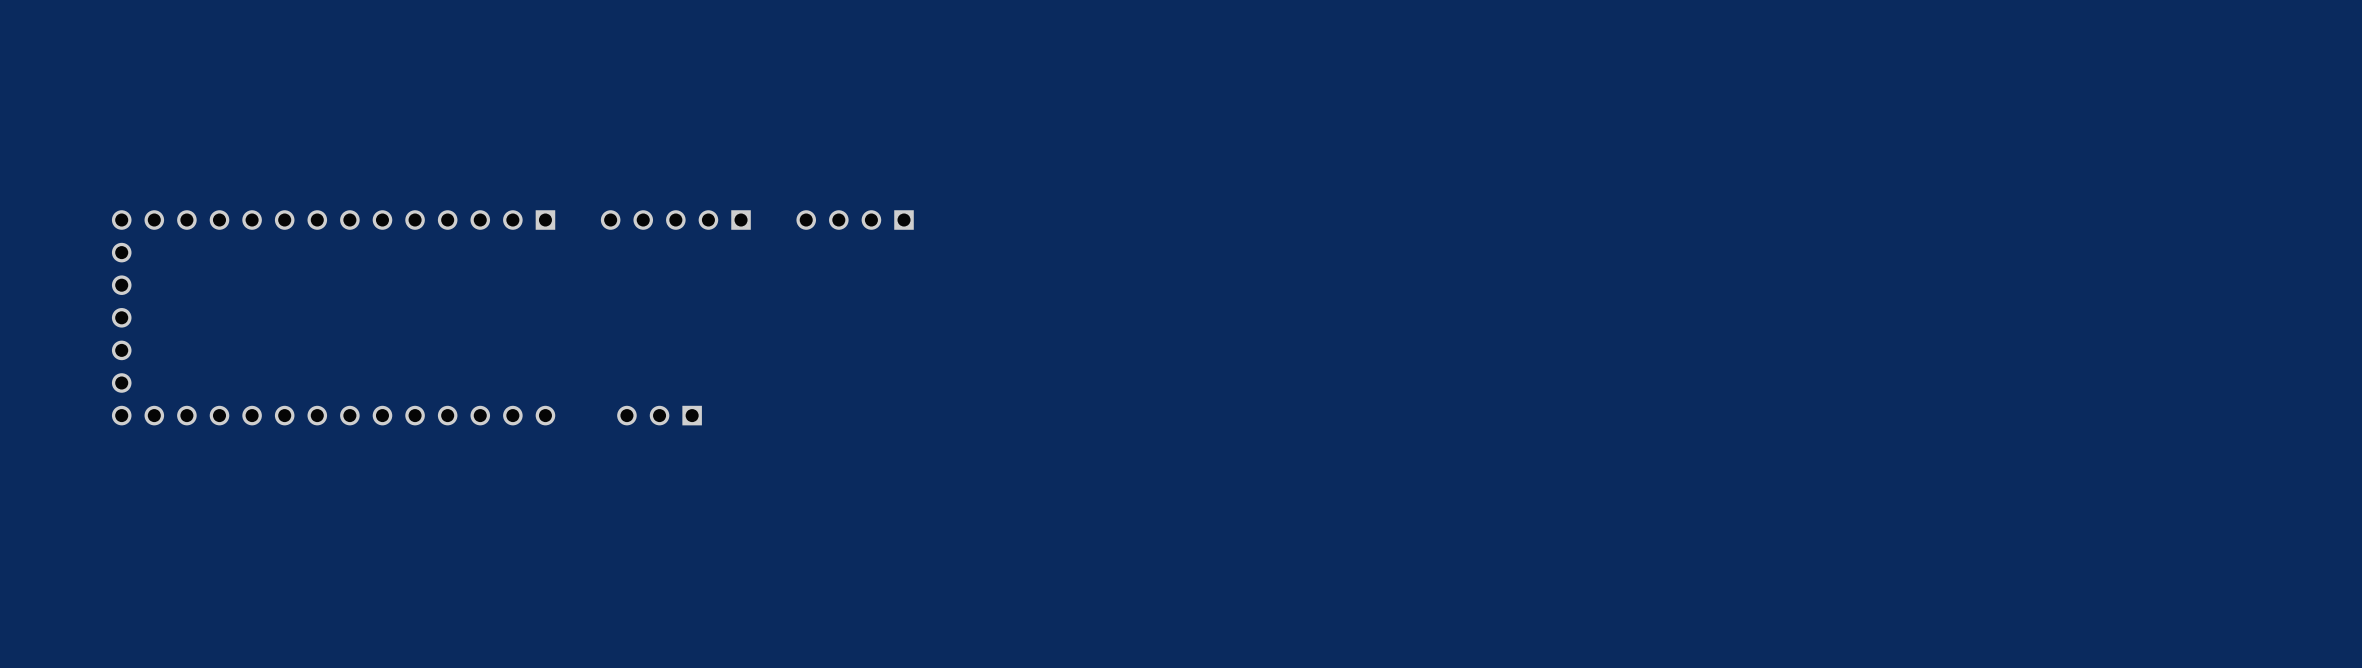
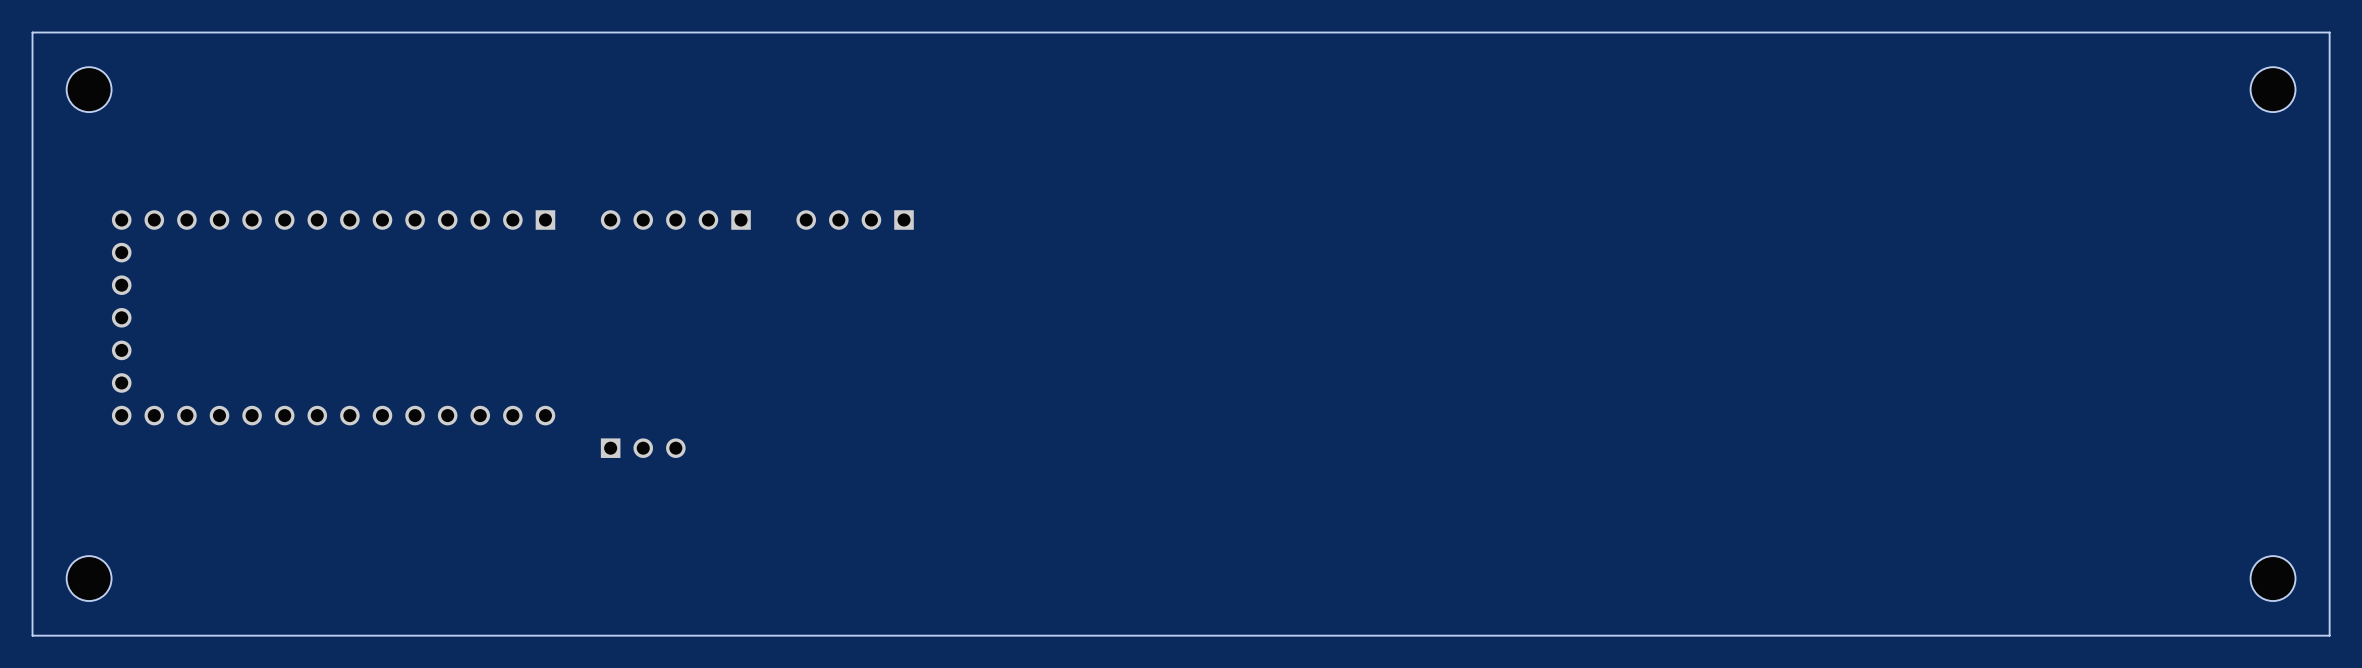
board edge: none -> (2329, 32) (2329, 635) (32, 635) (32, 32) (2329, 32)
part: none -> (89, 89)
part: none -> (2273, 89)
part rotation: 0° (659, 415) -> 180° (643, 448)
part: none -> (89, 578)
part: none -> (2273, 578)

